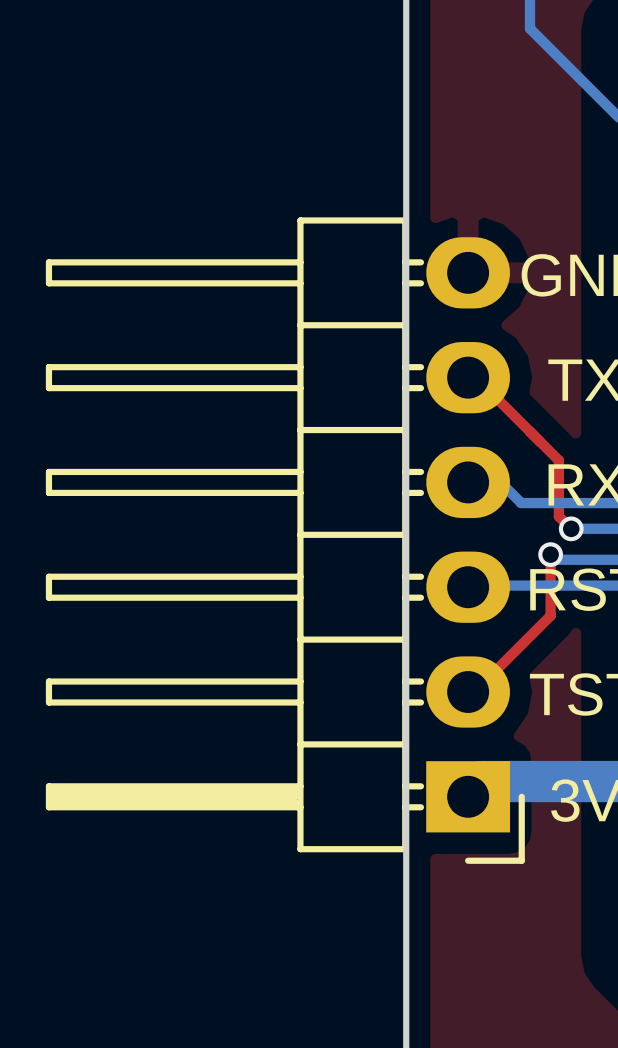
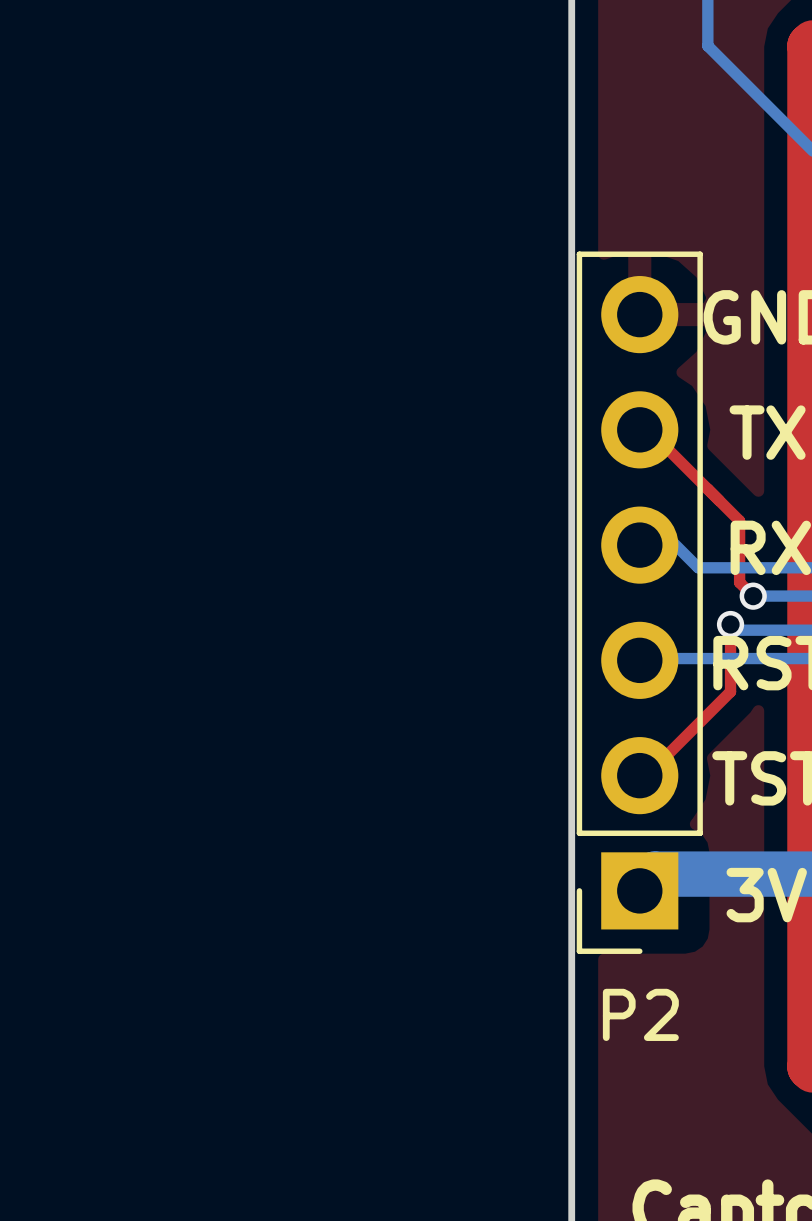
P2: none -> (639, 602)
part: (285, 540) -> none

